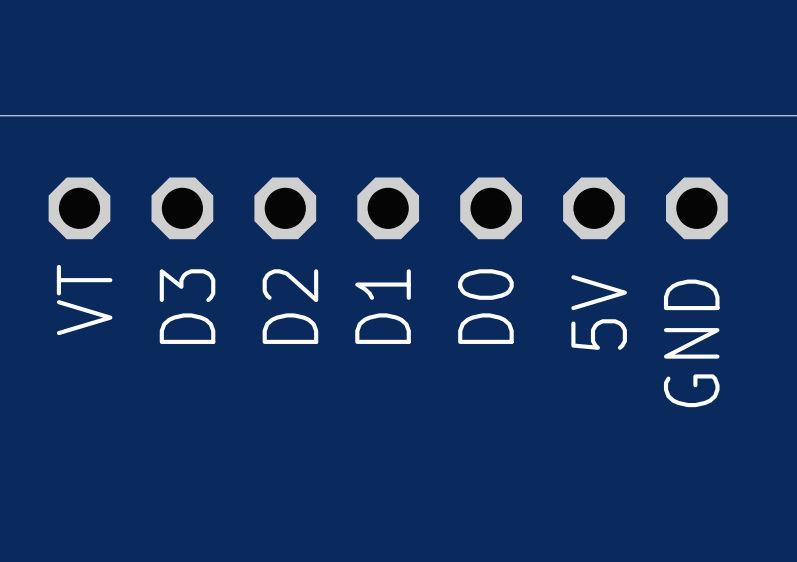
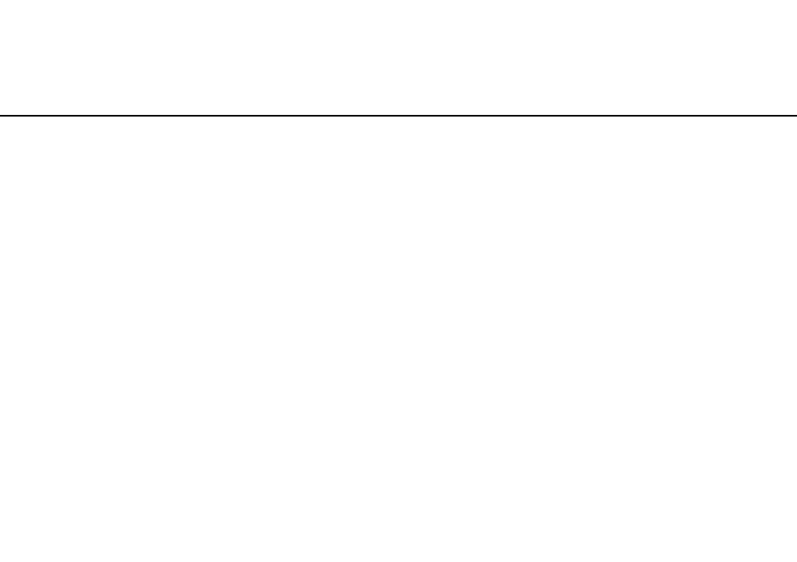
part: (79, 208) -> none
part: (182, 208) -> none
part: (285, 208) -> none
part: (388, 208) -> none
part: (491, 208) -> none
part: (593, 208) -> none
part: (696, 208) -> none
text: VT (84, 299) -> none
text: D3 (187, 306) -> none
text: D2 (290, 306) -> none
text: D1 (383, 306) -> none
text: D0 (485, 306) -> none
text: 5V (599, 312) -> none
text: GND (691, 343) -> none

